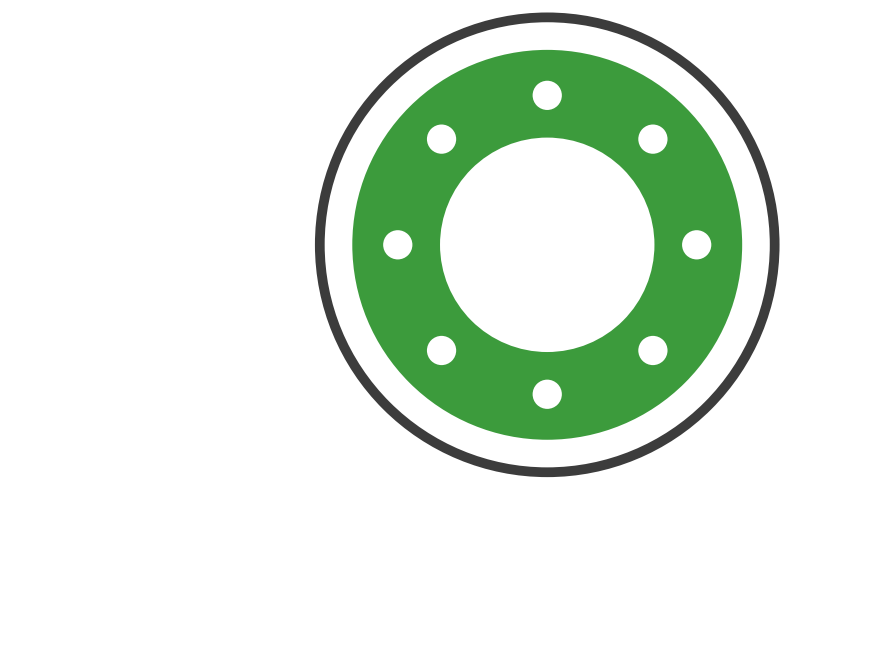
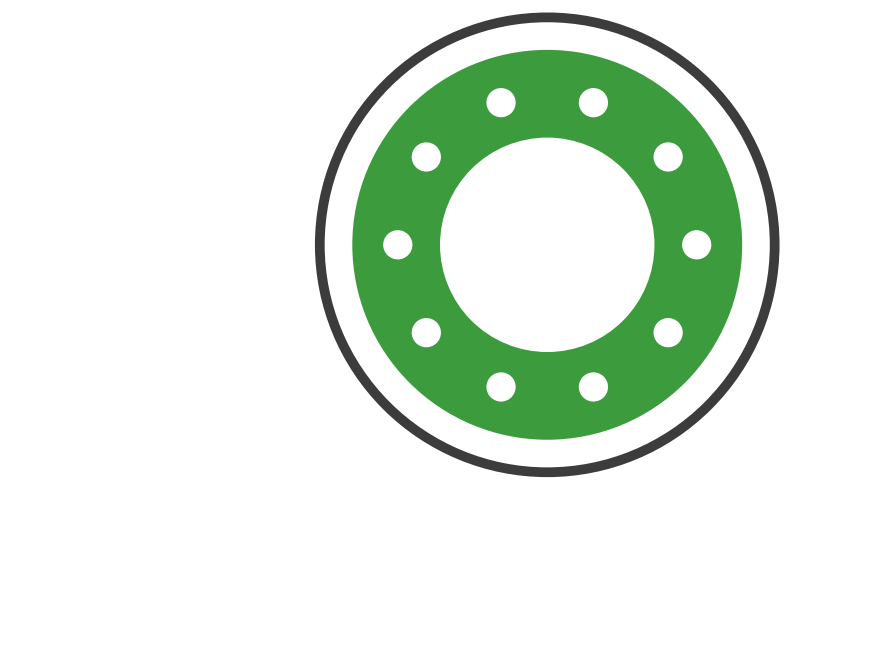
part footprint: [314, 12, 780, 478] -> [314, 12, 780, 478]

